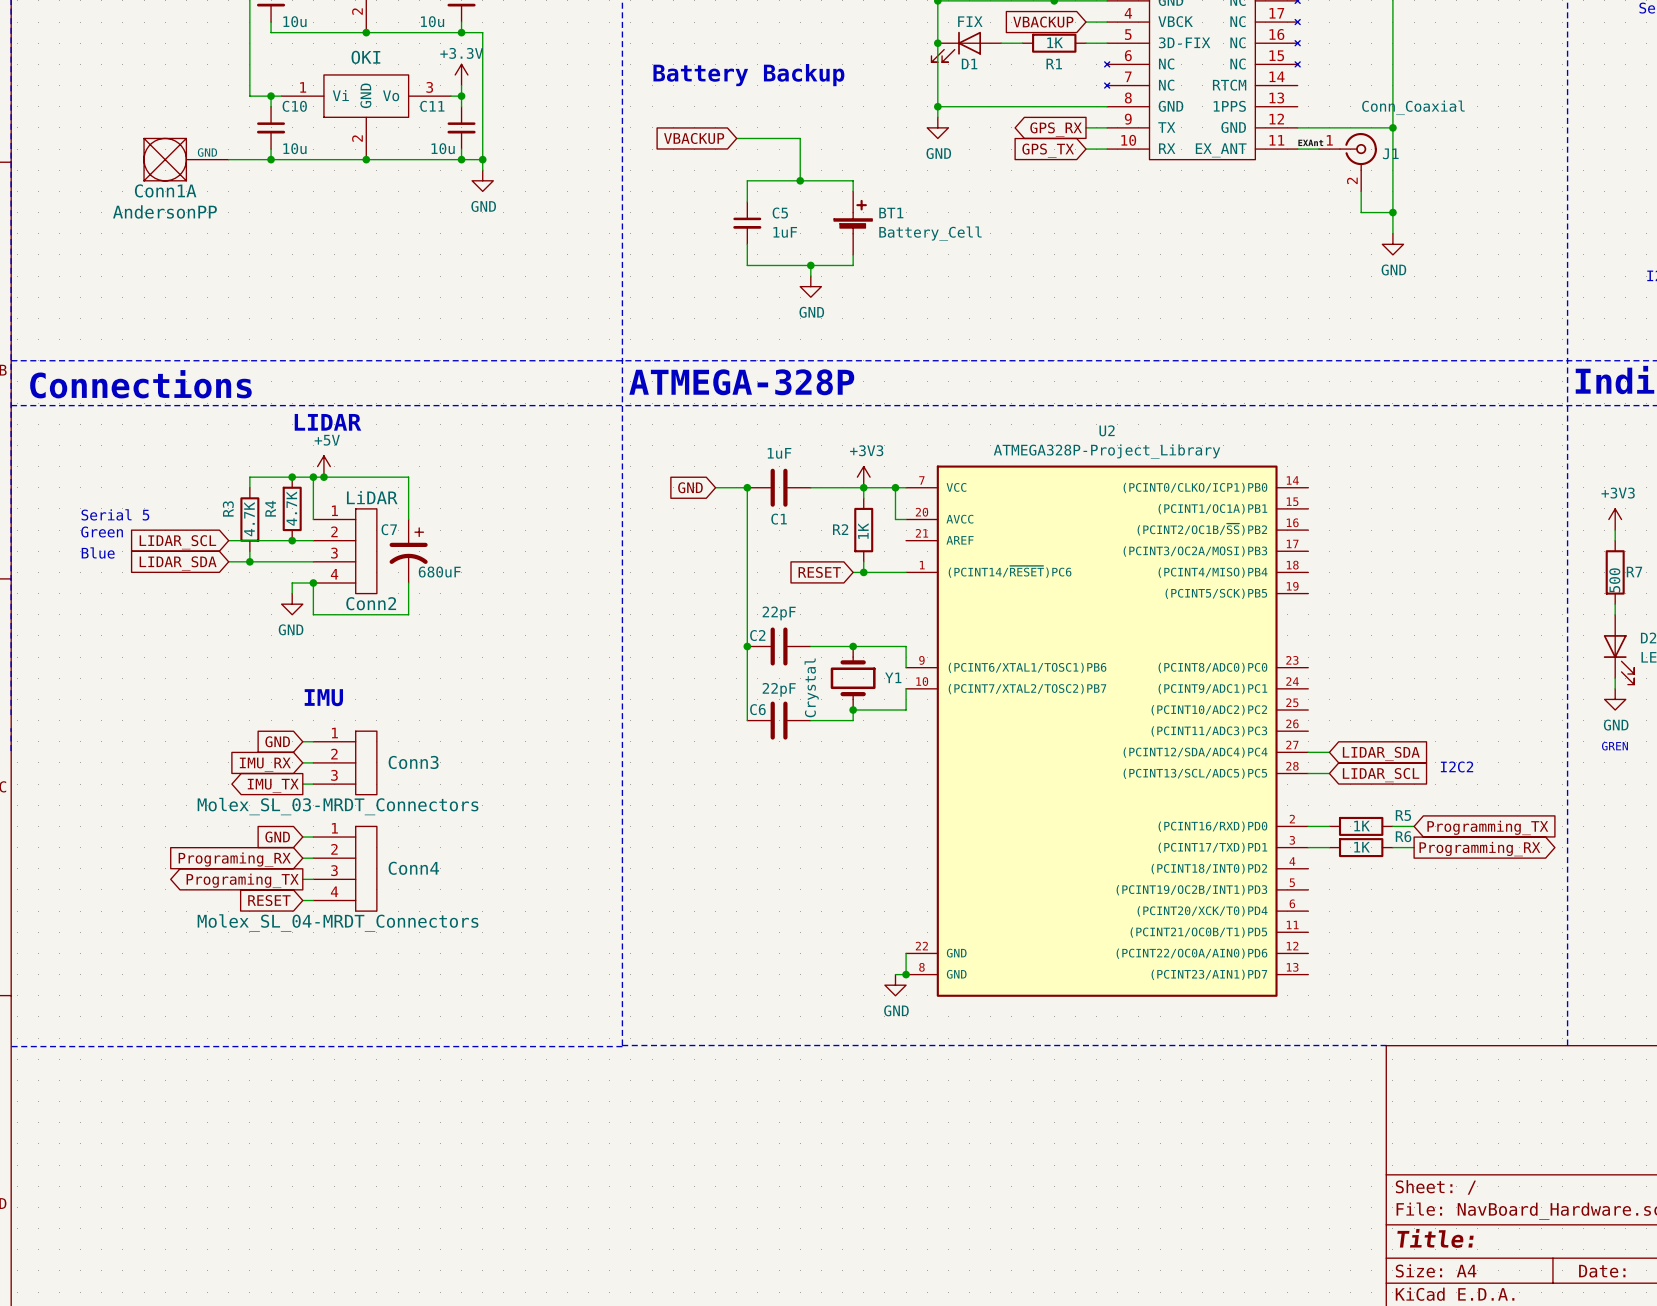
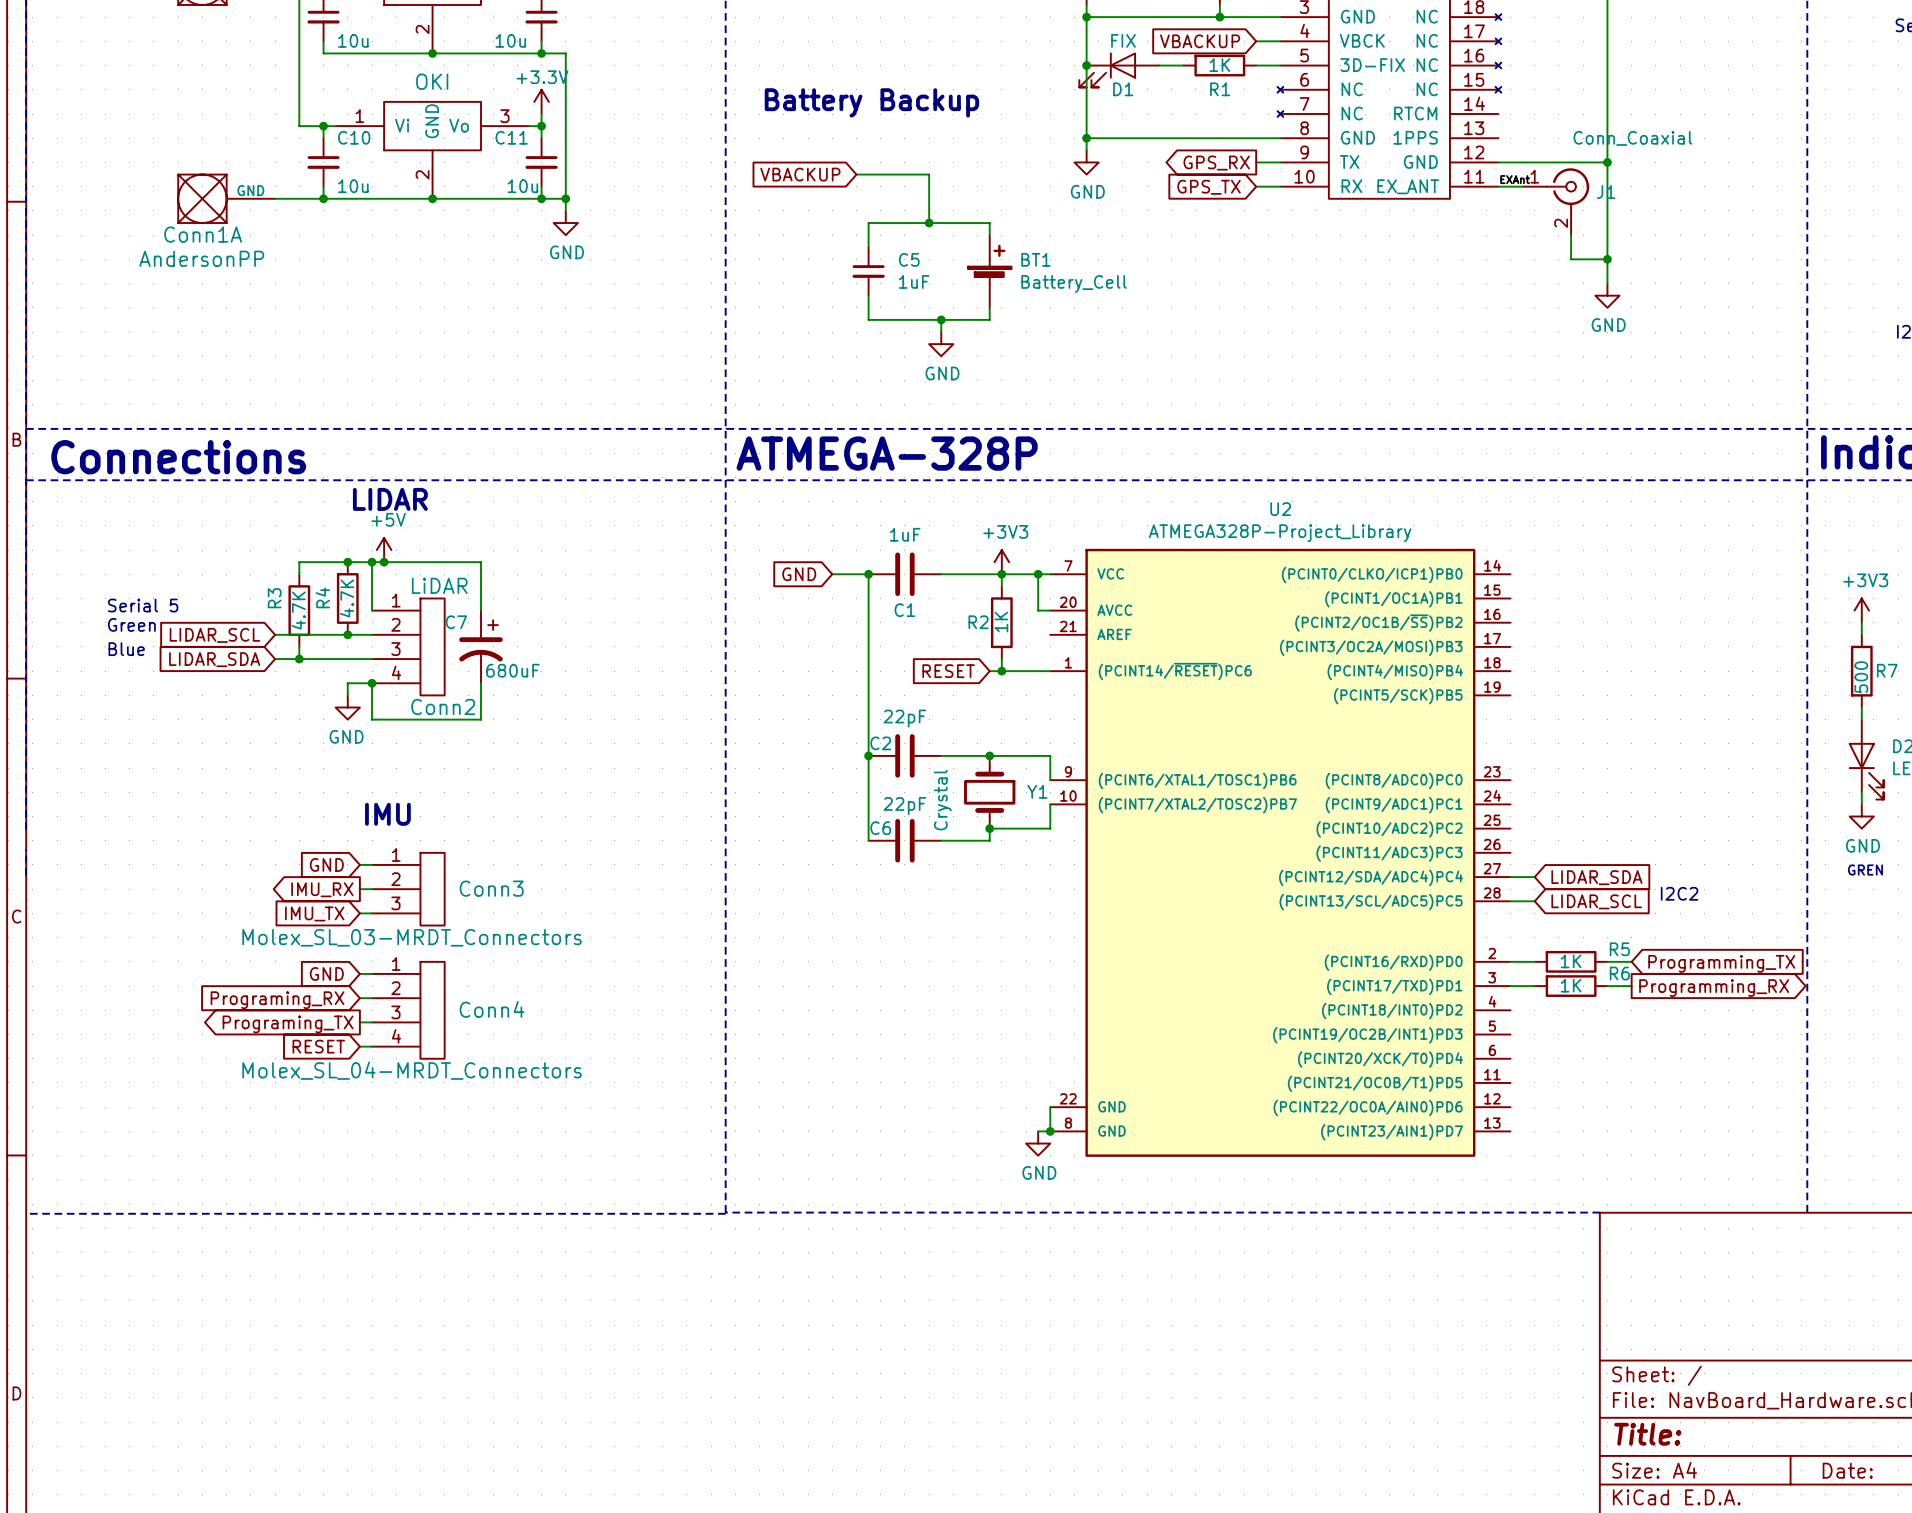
global label shape: input (265, 764) -> output (322, 889)
global label shape: output (273, 785) -> input (314, 913)

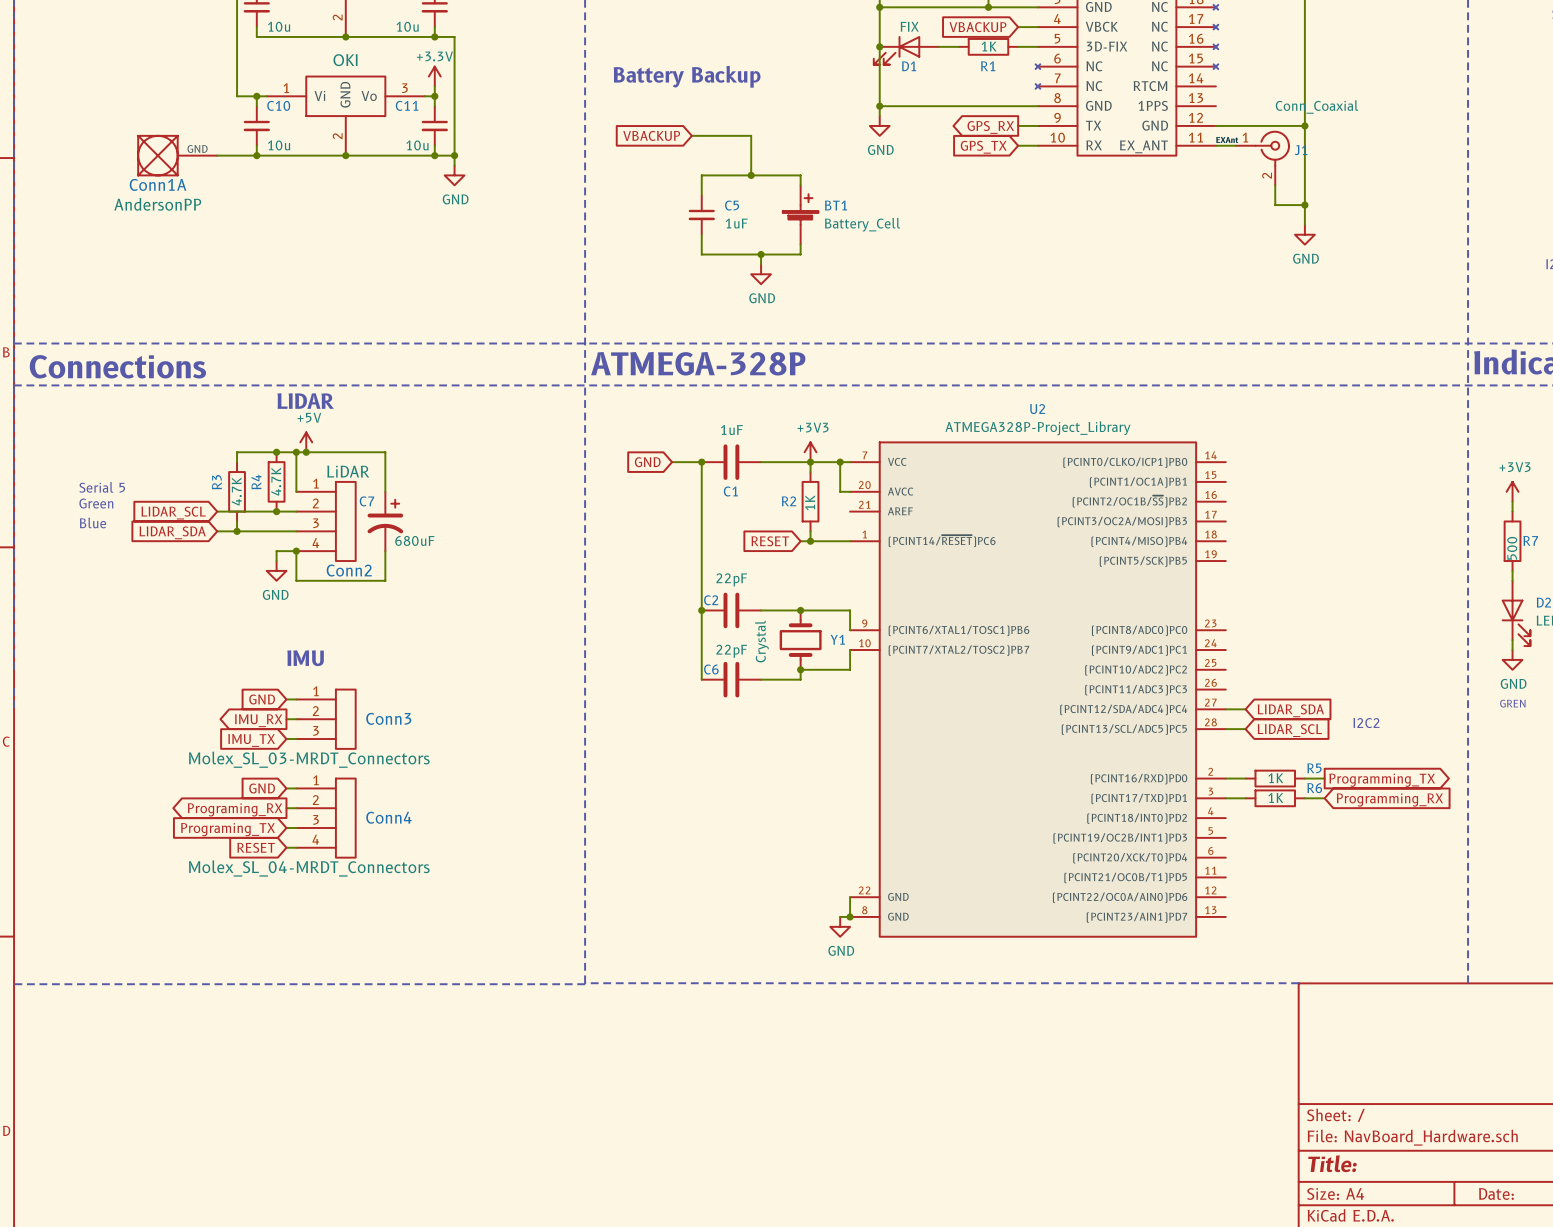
global label shape: input (1721, 963) -> output (1382, 780)
global label shape: output (1714, 988) -> input (1389, 800)
global label shape: input (277, 1000) -> output (235, 809)
global label shape: output (288, 1024) -> input (227, 829)

